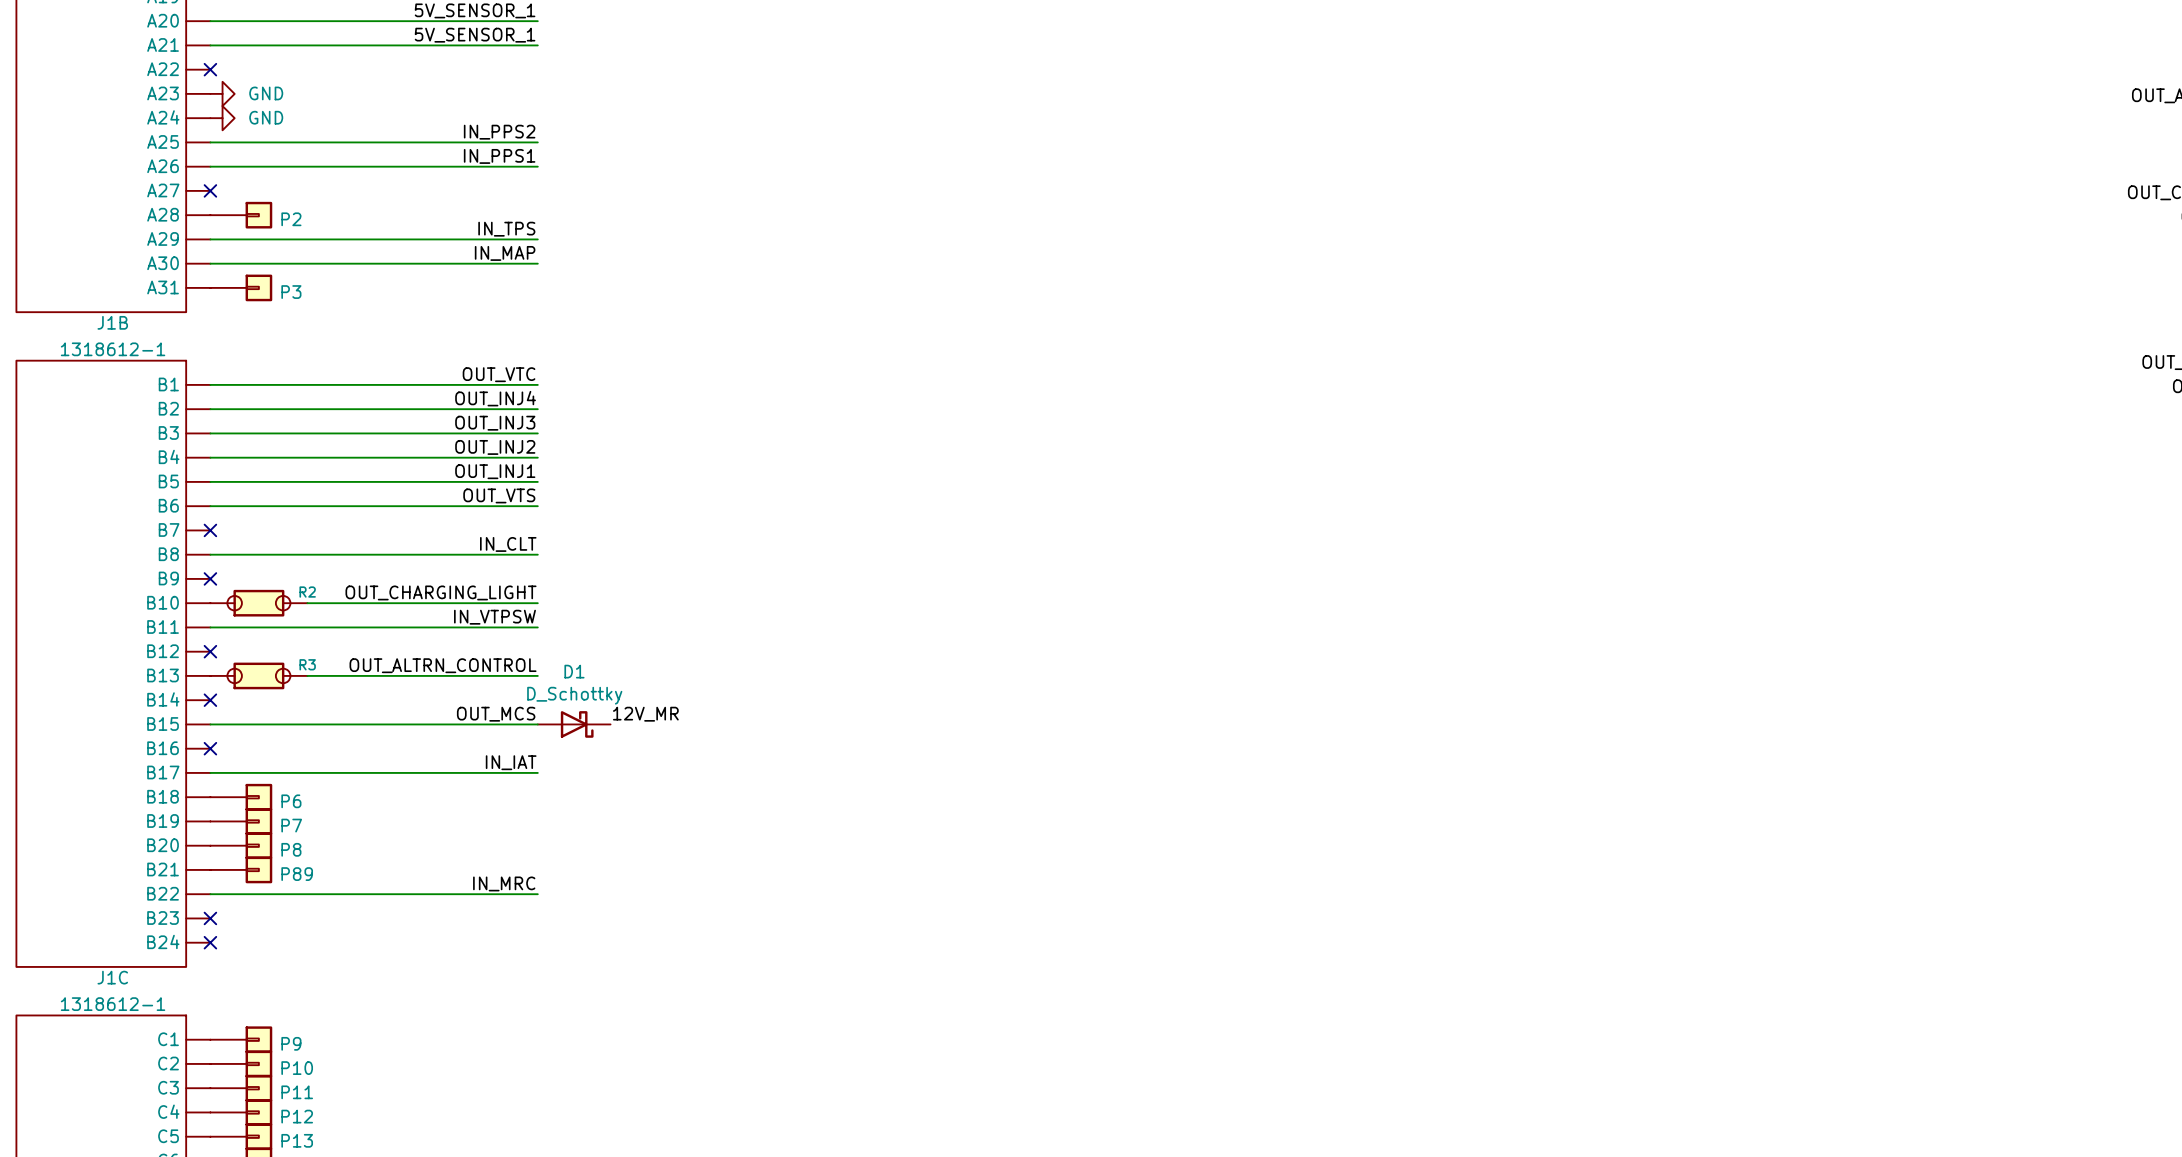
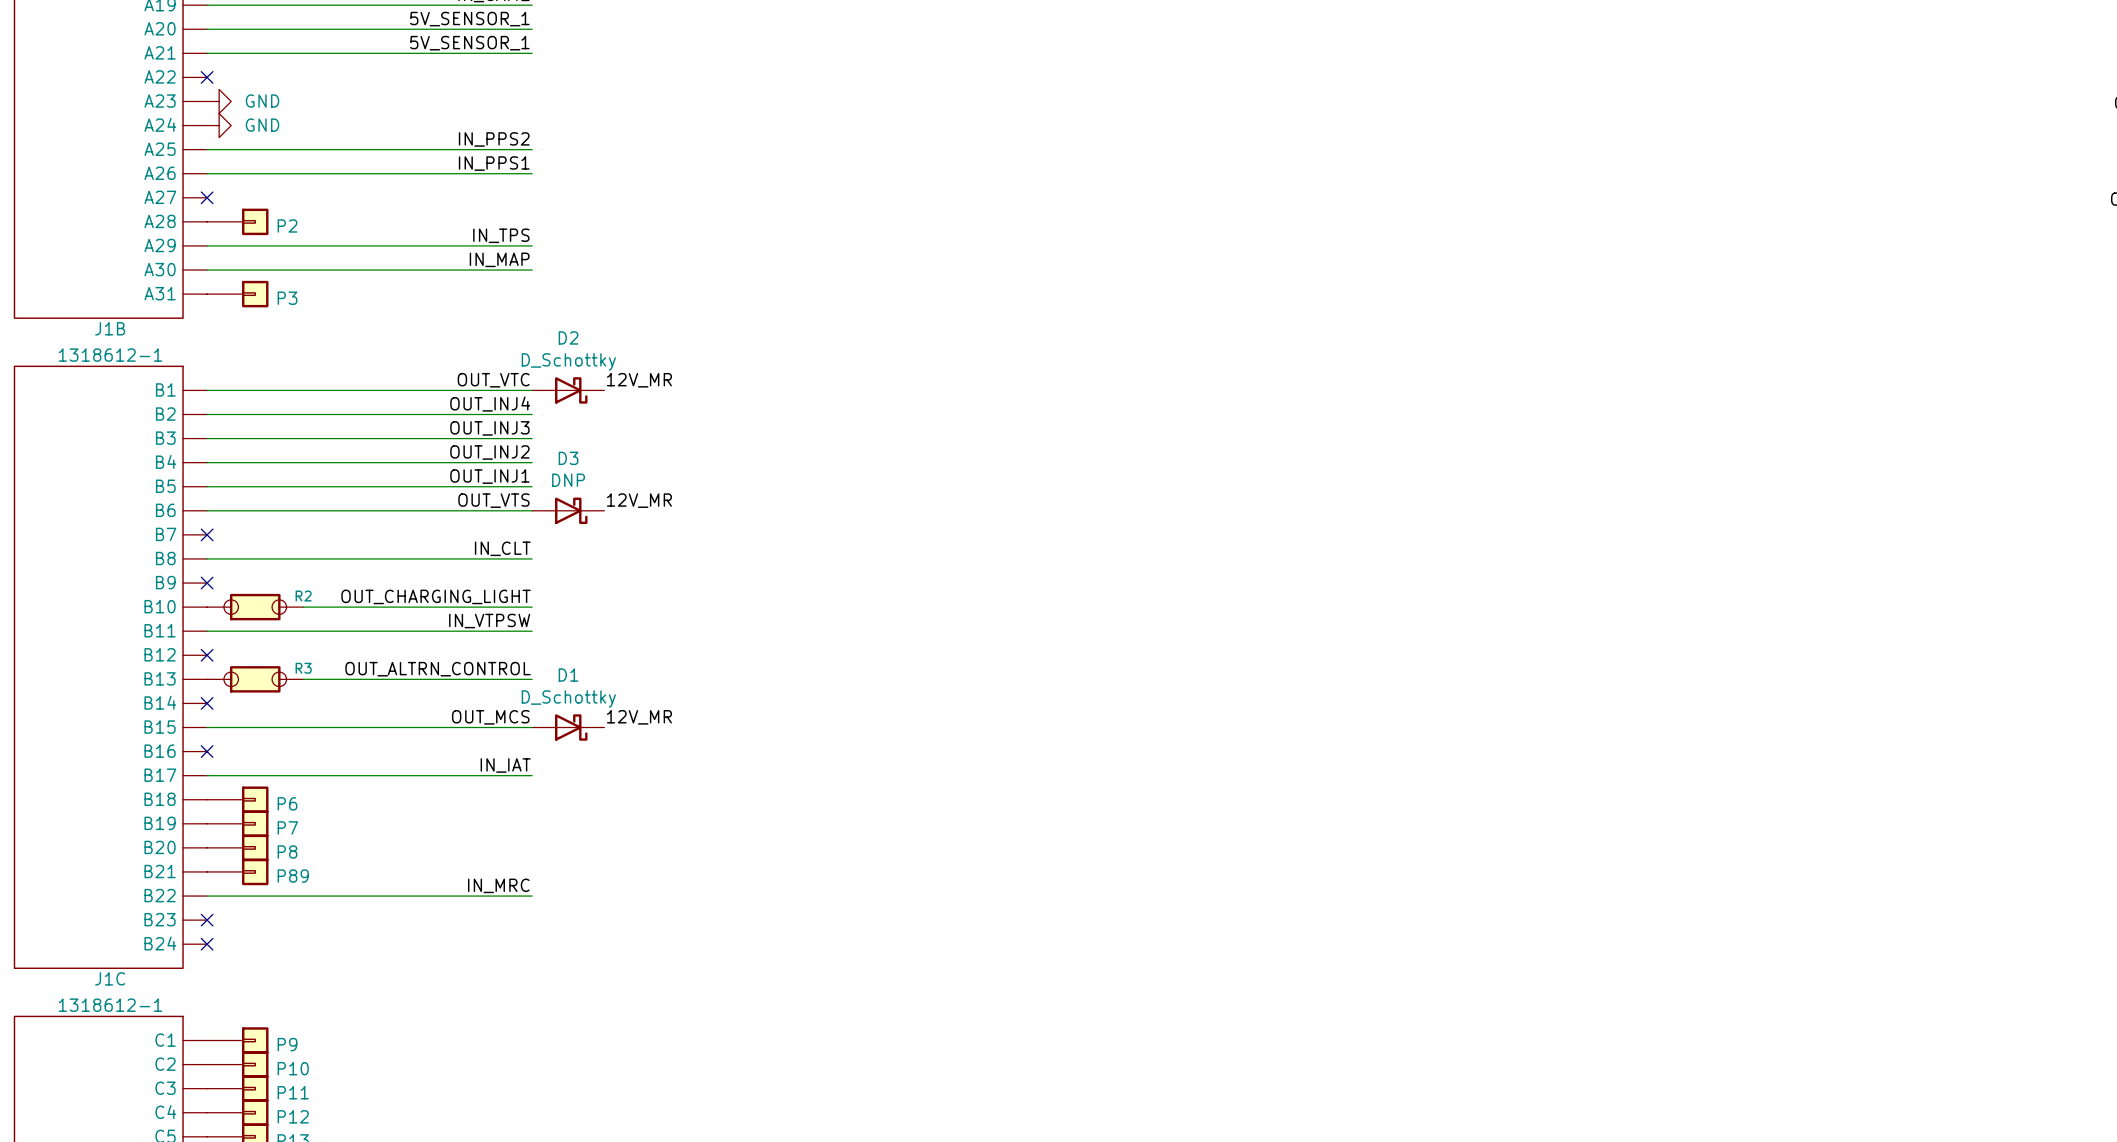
label: none -> 12V_MR (639, 380)
D2: none -> D_Schottky (568, 390)
label: none -> 12V_MR (639, 500)
D3: none -> DNP (568, 510)

